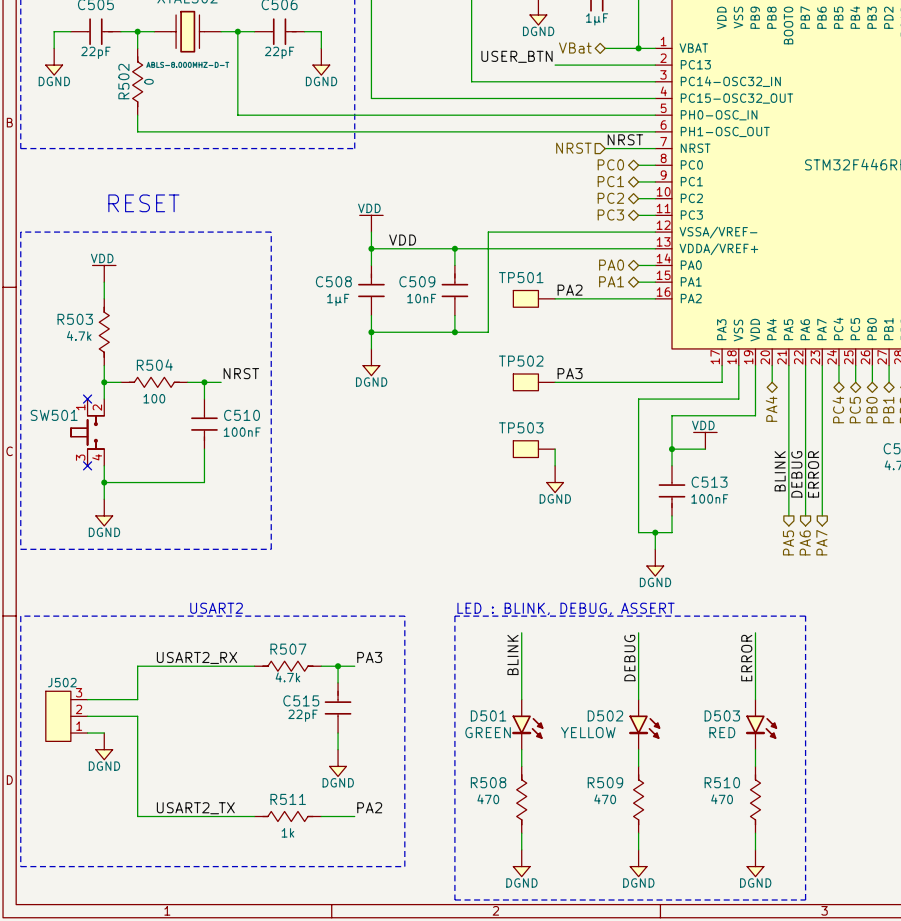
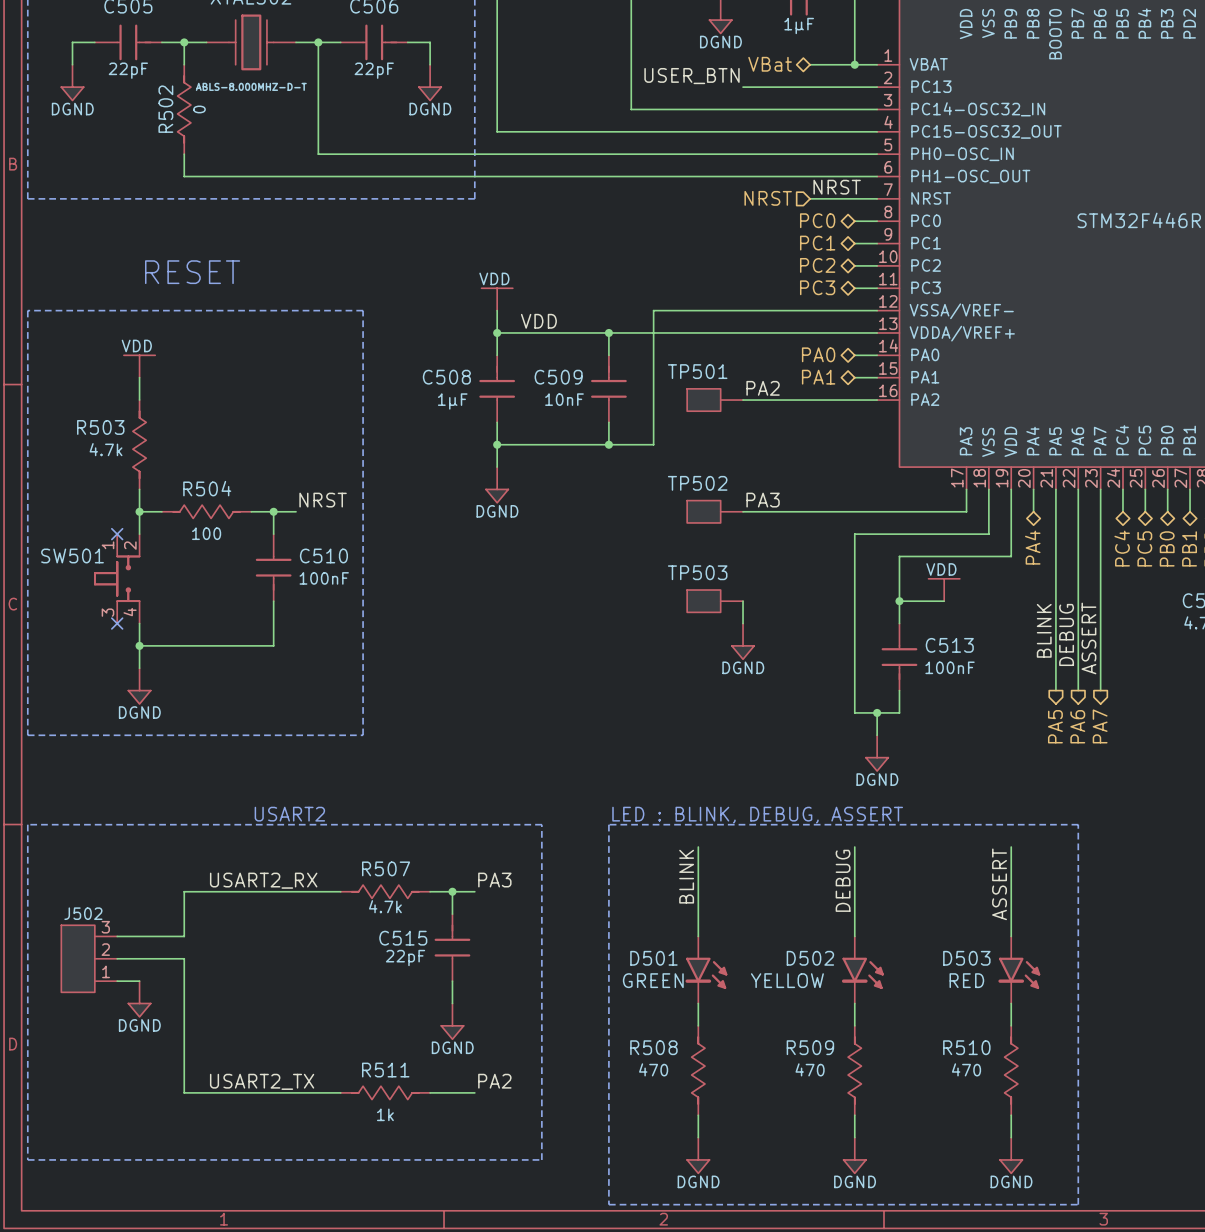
label: ERROR (813, 474) -> ASSERT (1088, 638)
label: ERROR (746, 658) -> ASSERT (999, 884)

